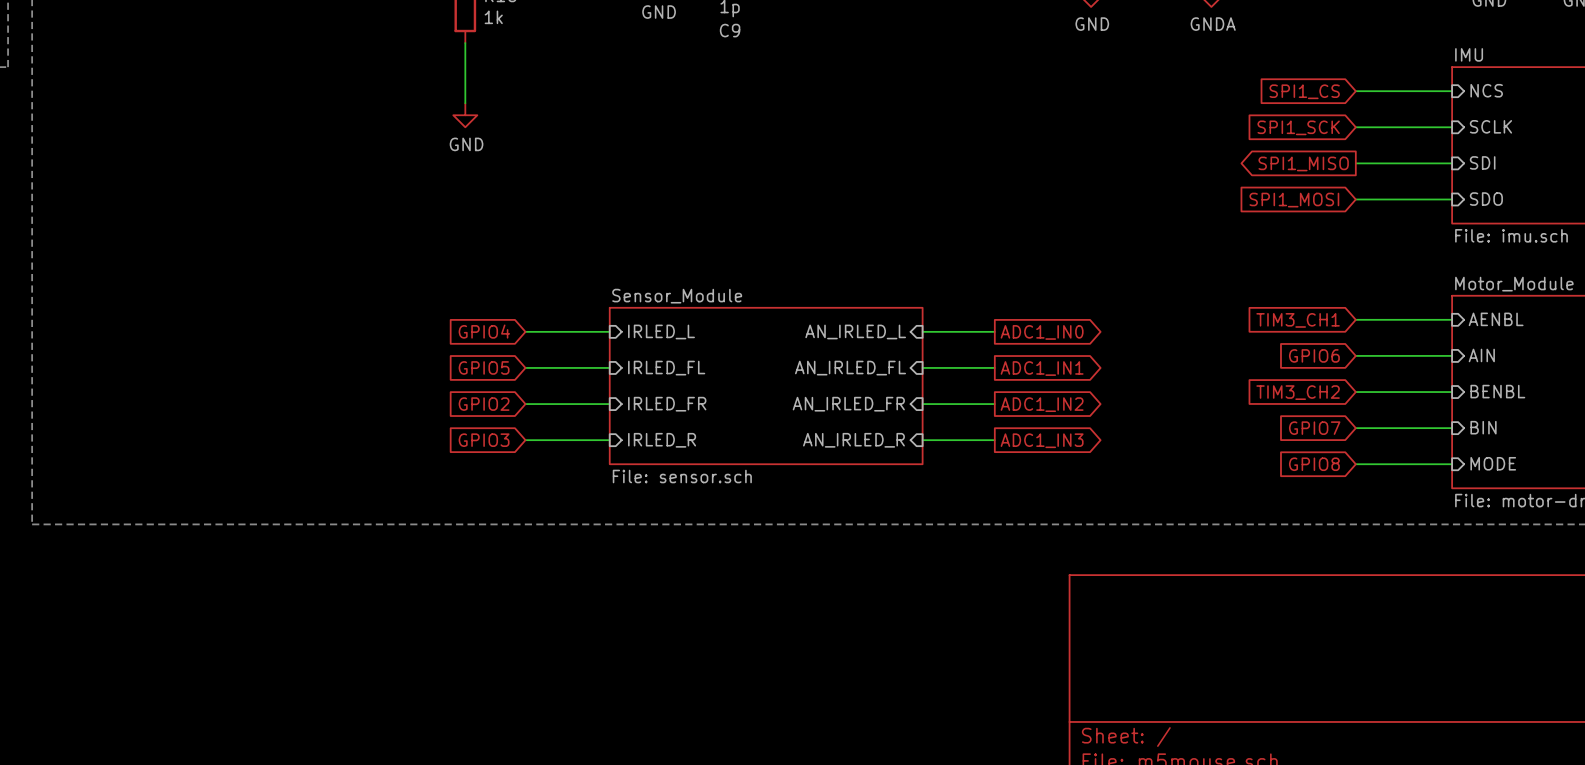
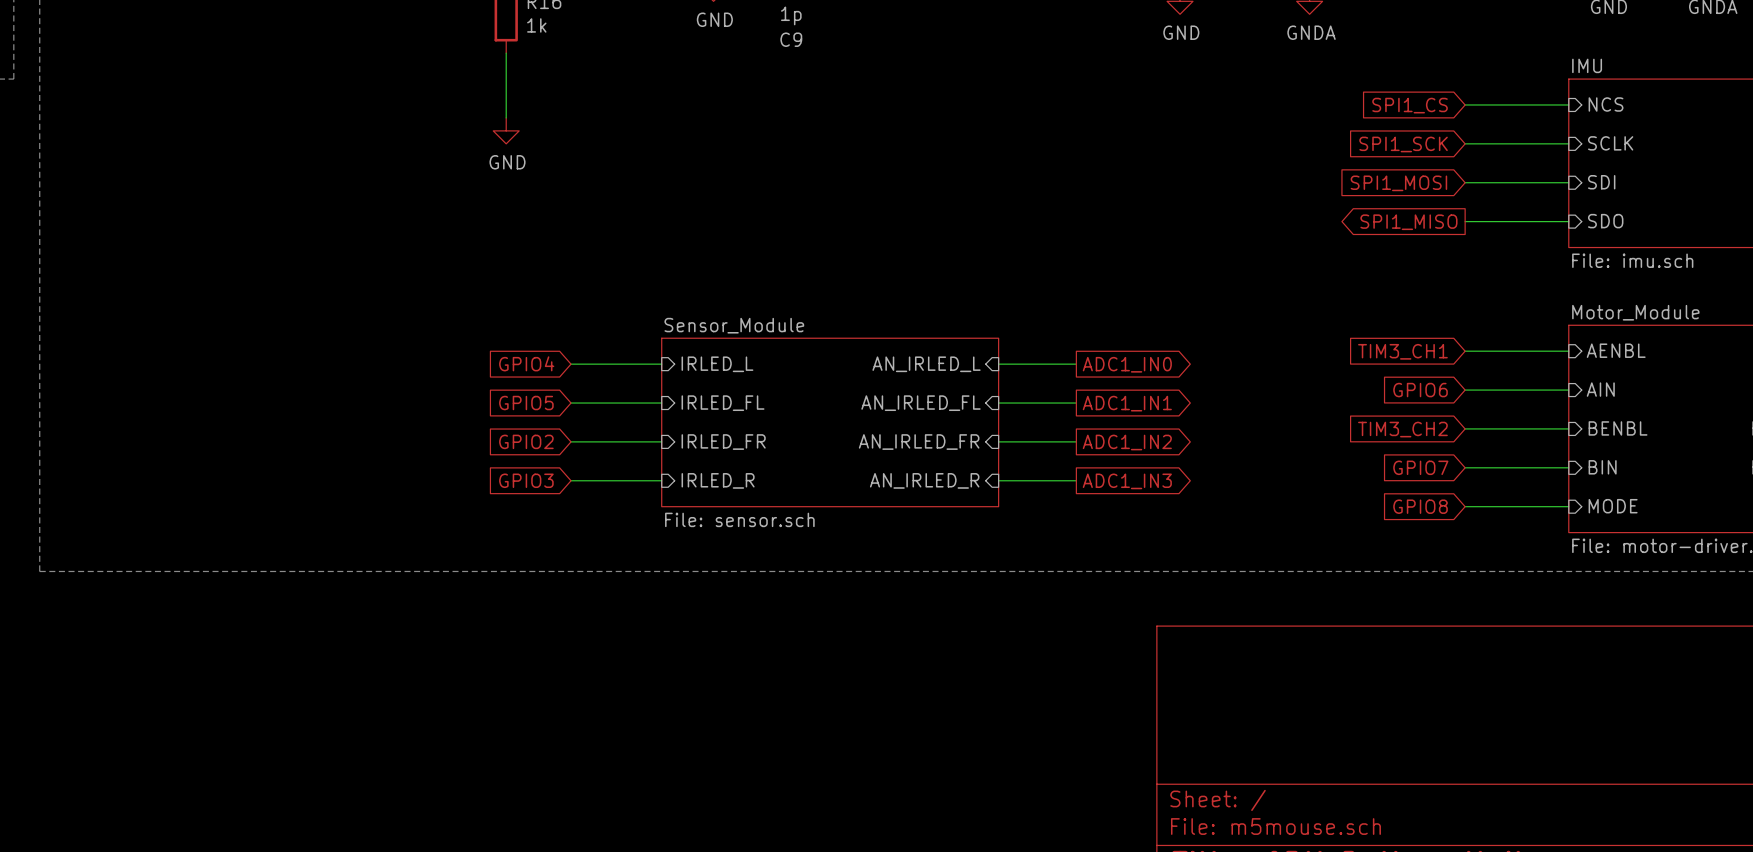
global label shape: output (1303, 163) -> input (1398, 183)
global label: SPI1_MISO (1303, 163) -> SPI1_MOSI (1398, 183)
global label shape: input (1294, 200) -> output (1408, 222)
global label: SPI1_MOSI (1294, 200) -> SPI1_MISO (1408, 222)

